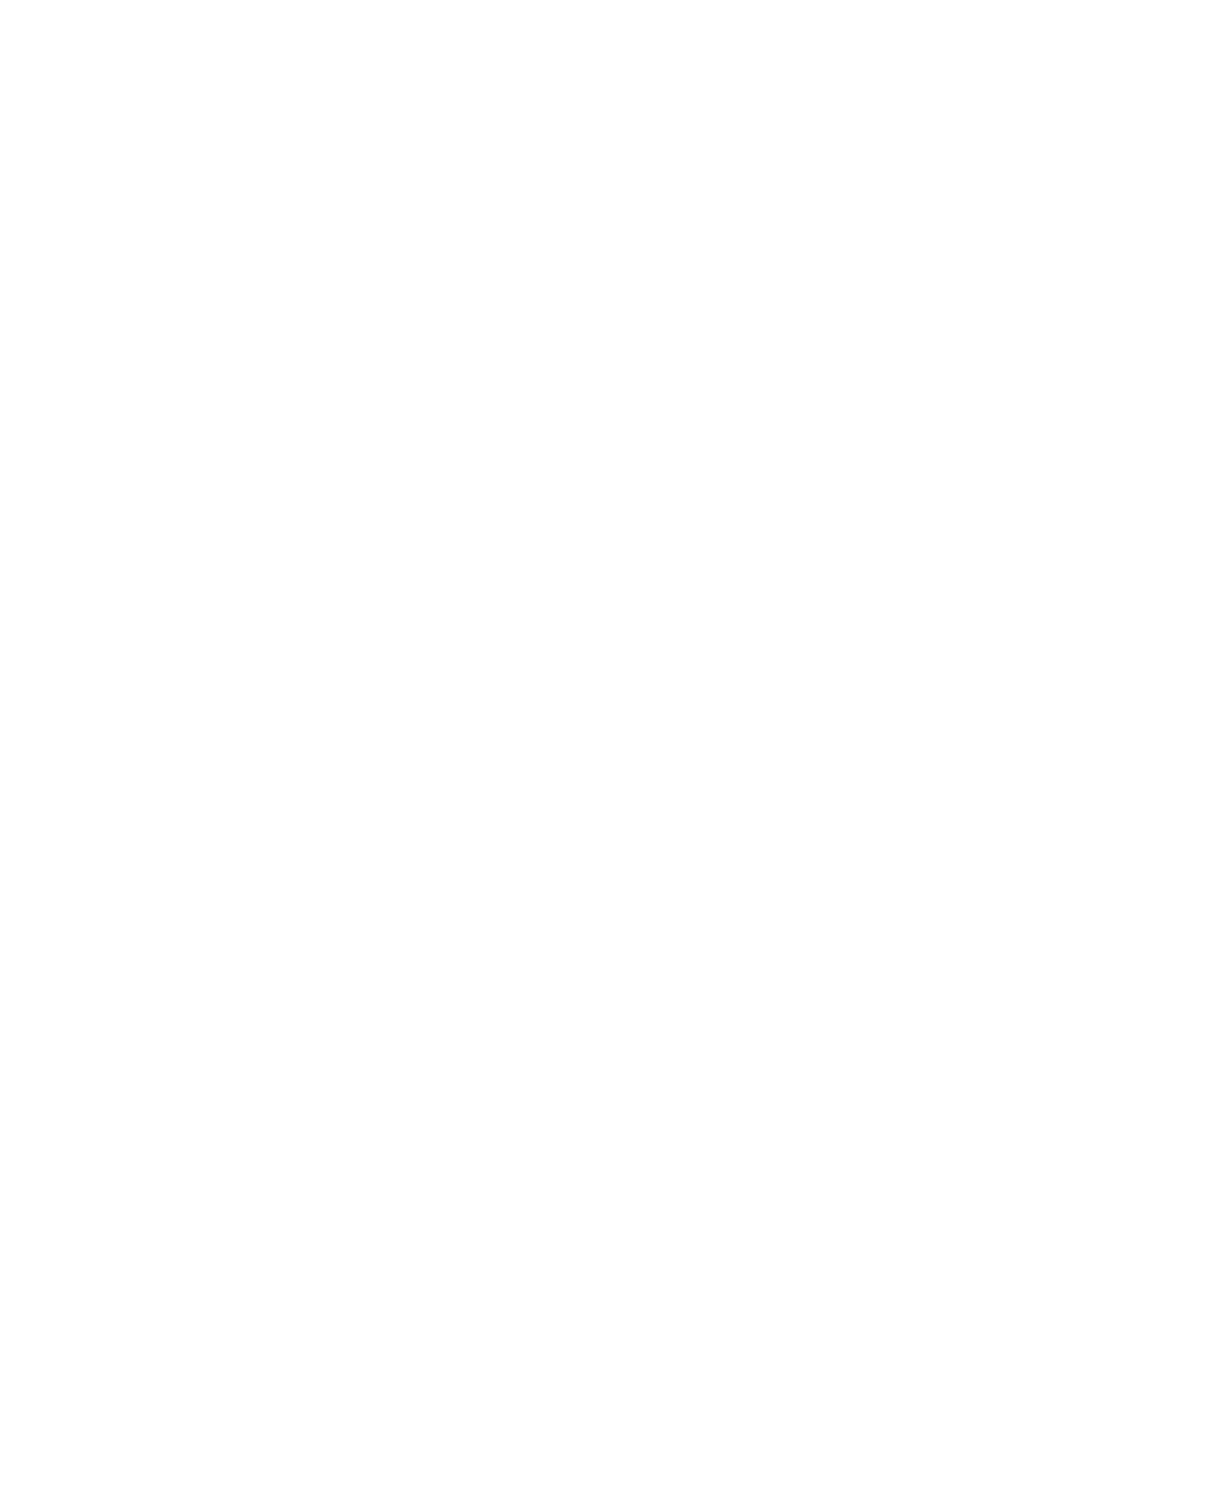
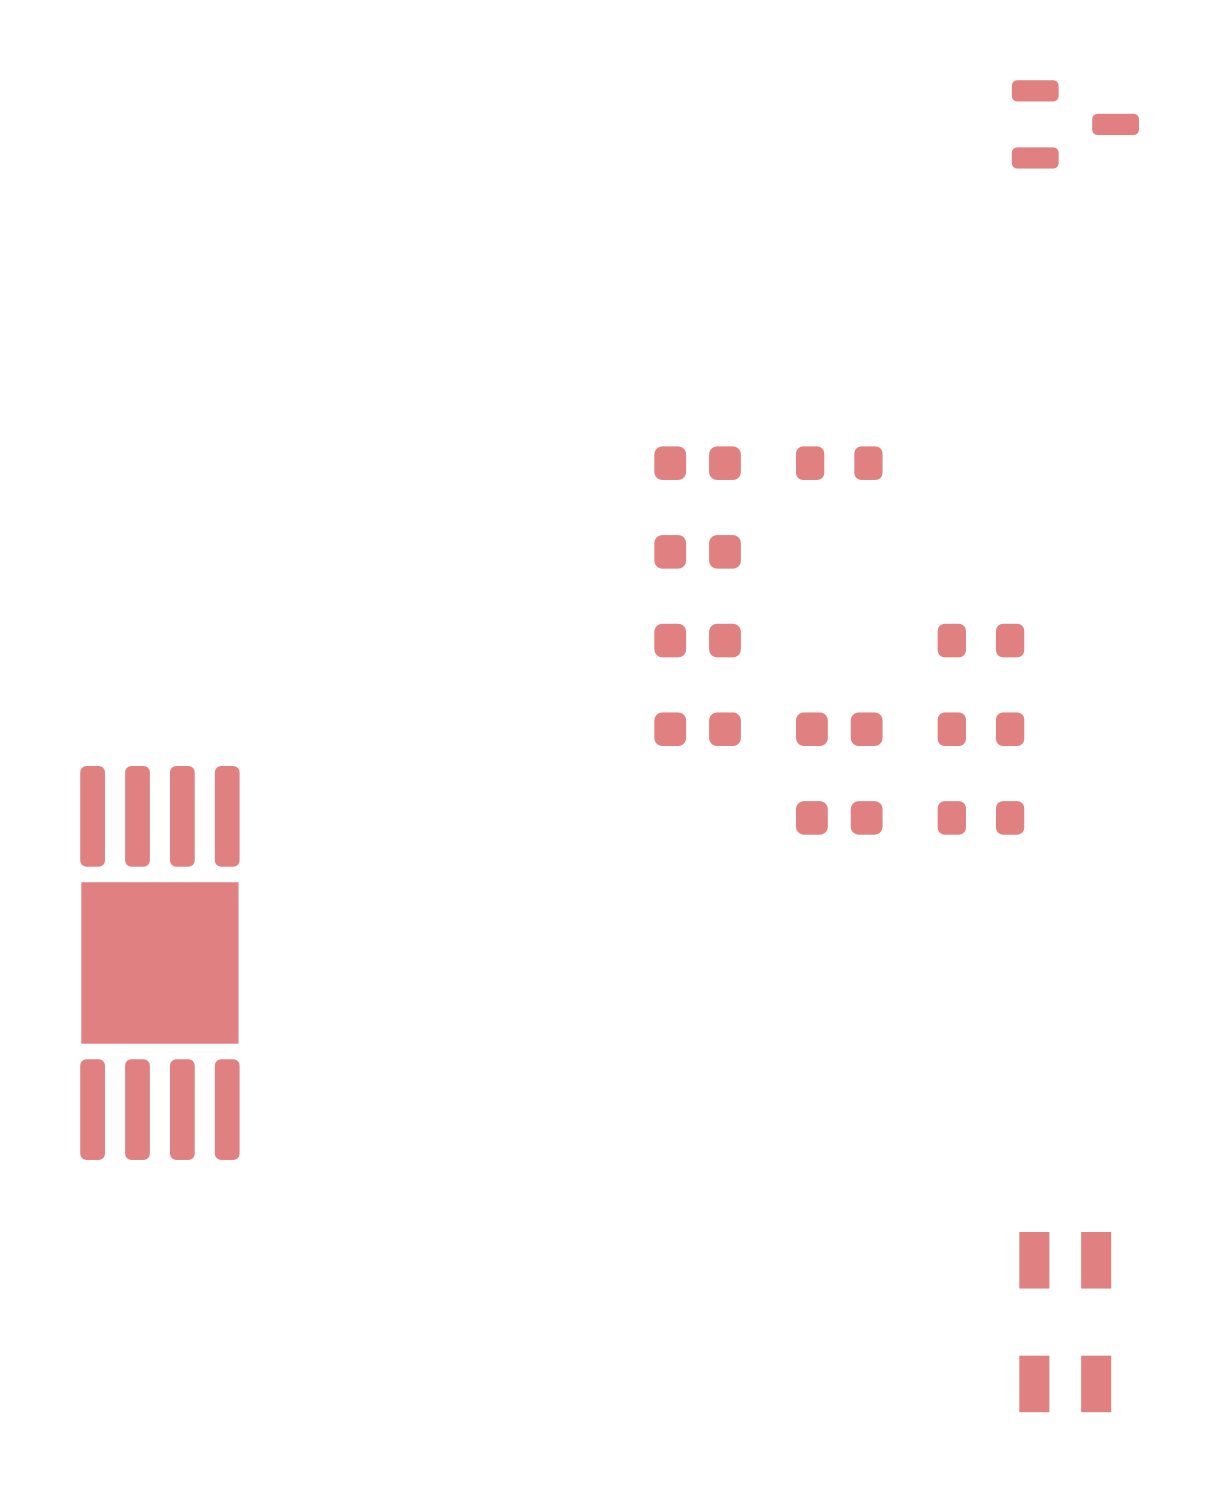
part: none -> (1075, 124)
part: none -> (697, 463)
part: none -> (839, 463)
part: none -> (697, 551)
part: none -> (697, 640)
part: none -> (980, 640)
part: none -> (697, 729)
part: none -> (839, 729)
part: none -> (980, 729)
part: none -> (839, 817)
part: none -> (980, 817)
part: none -> (159, 962)
part: none -> (1065, 1322)

